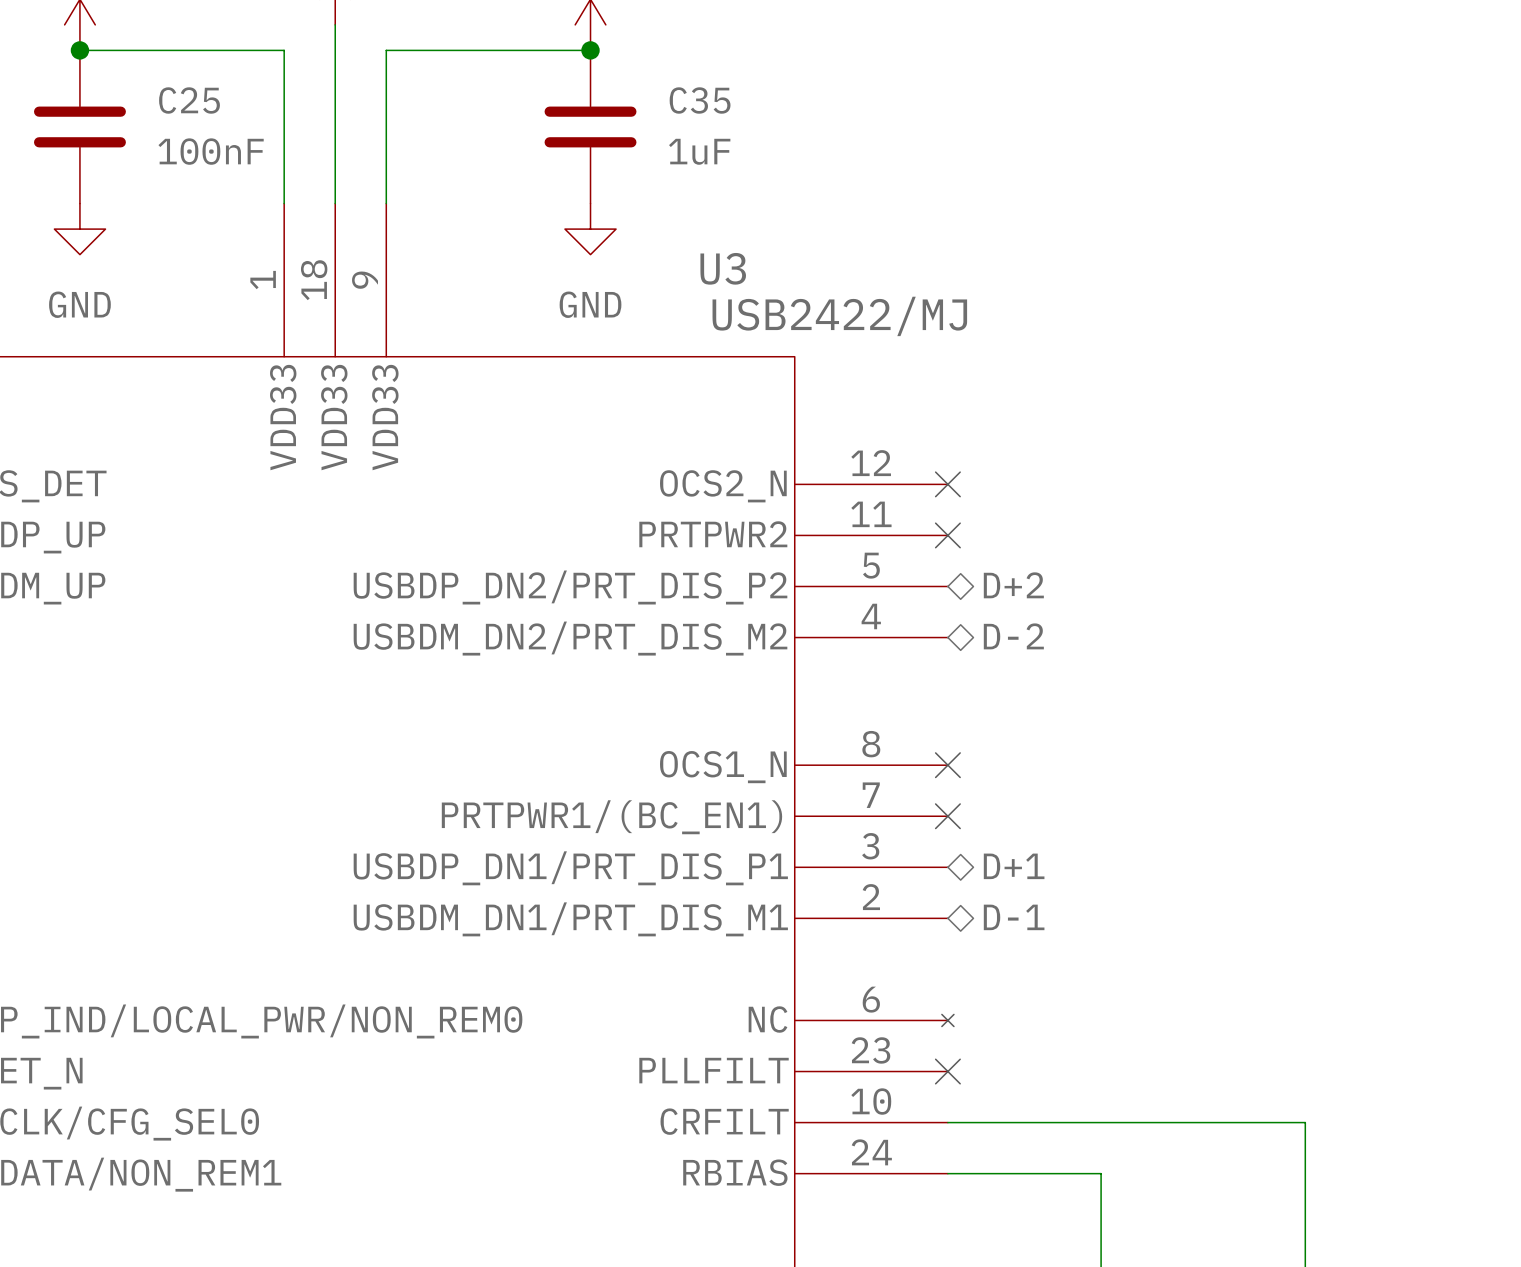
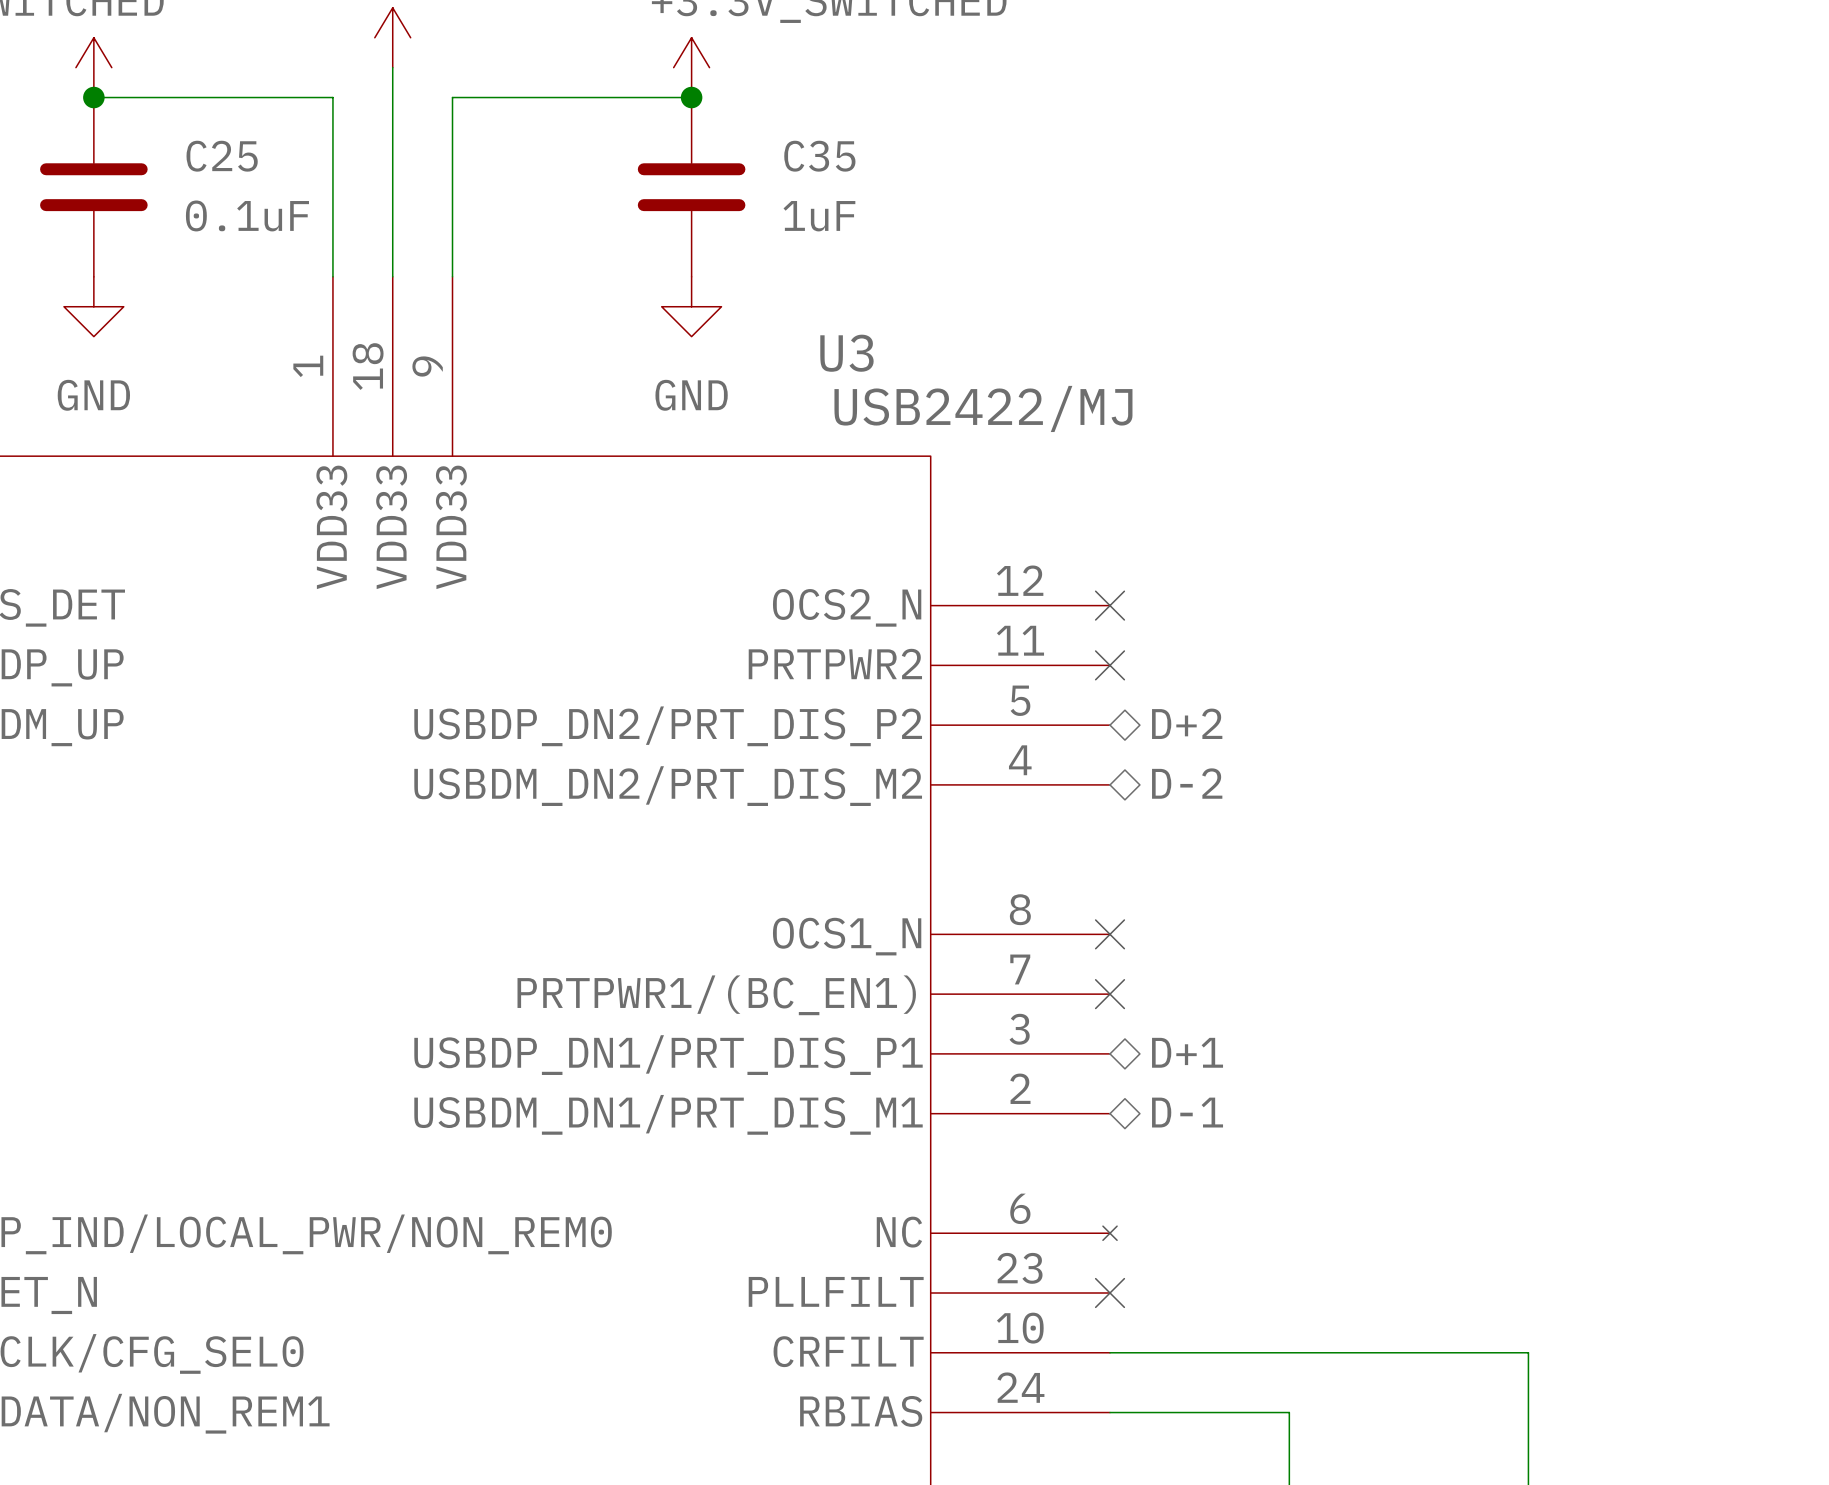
C25 value: 100nF (211, 151) -> 0.1uF (247, 215)

